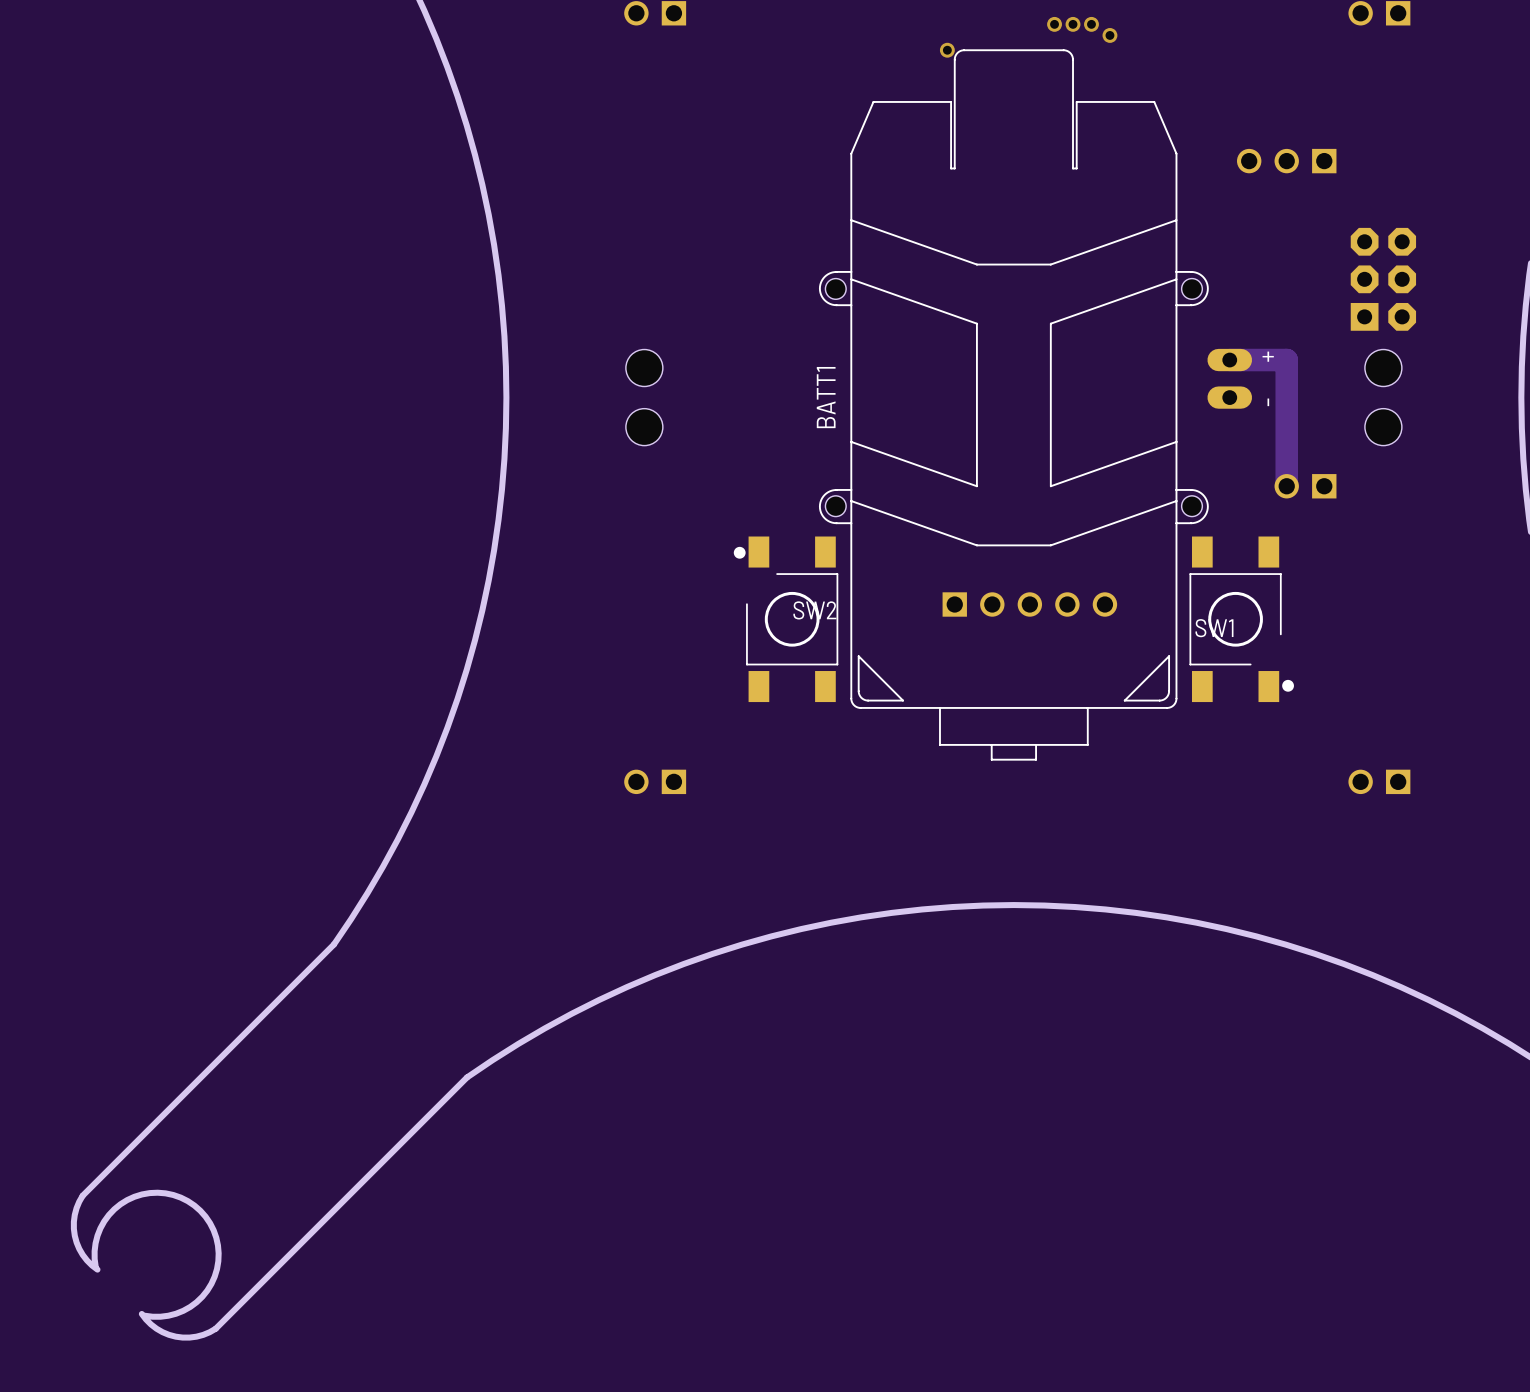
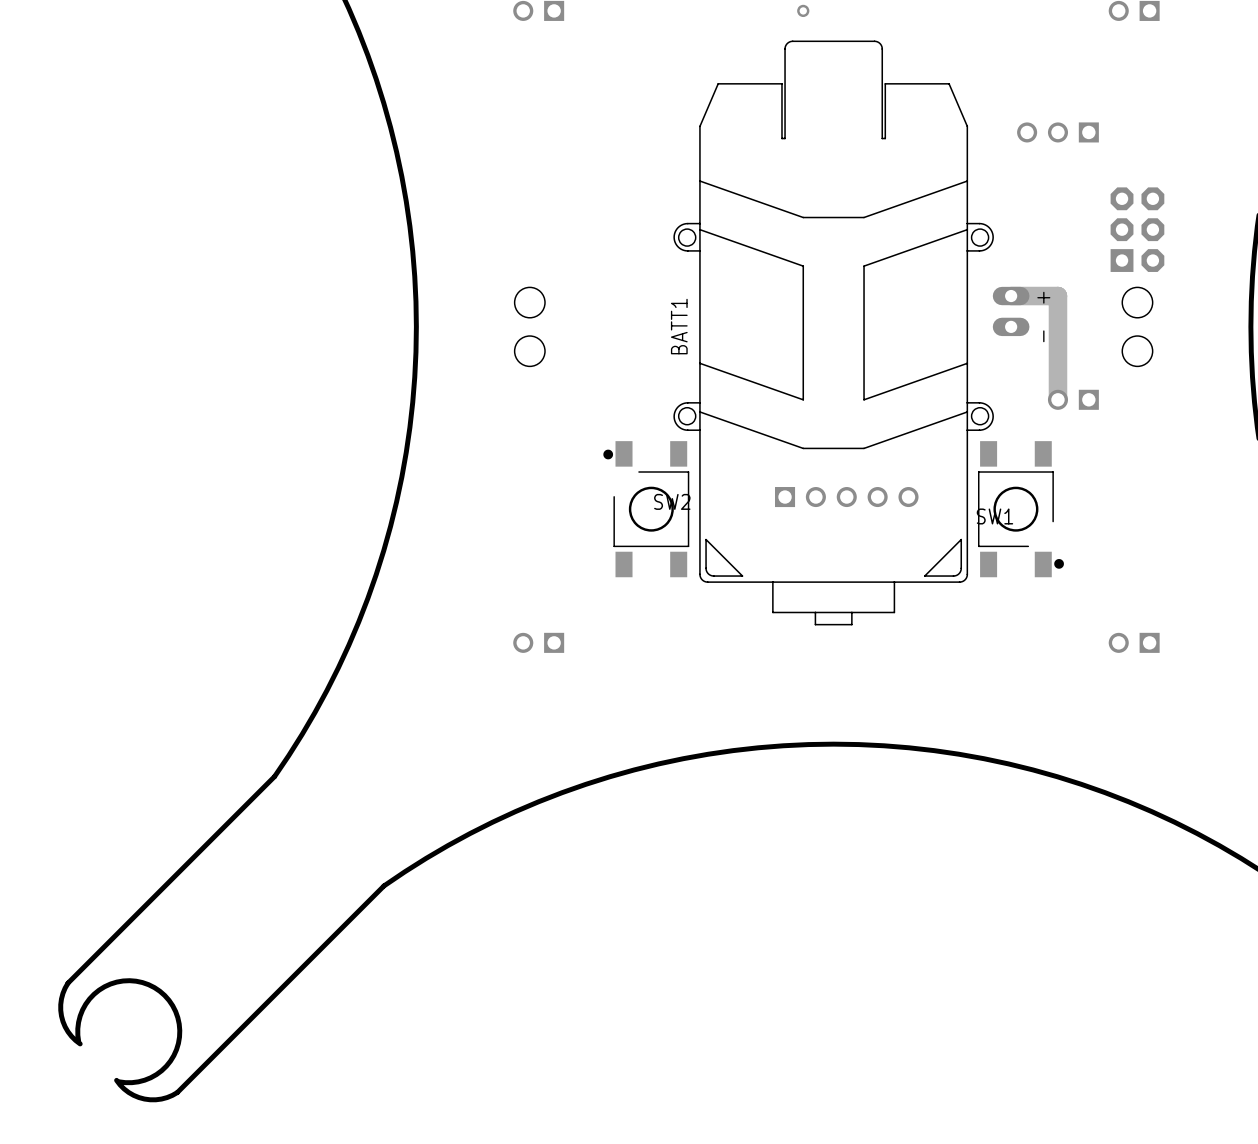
via: none -> (803, 10)
via: (1054, 24) -> none
via: (1073, 24) -> none
via: (1091, 24) -> none
via: (1109, 35) -> none
via: (947, 50) -> none

